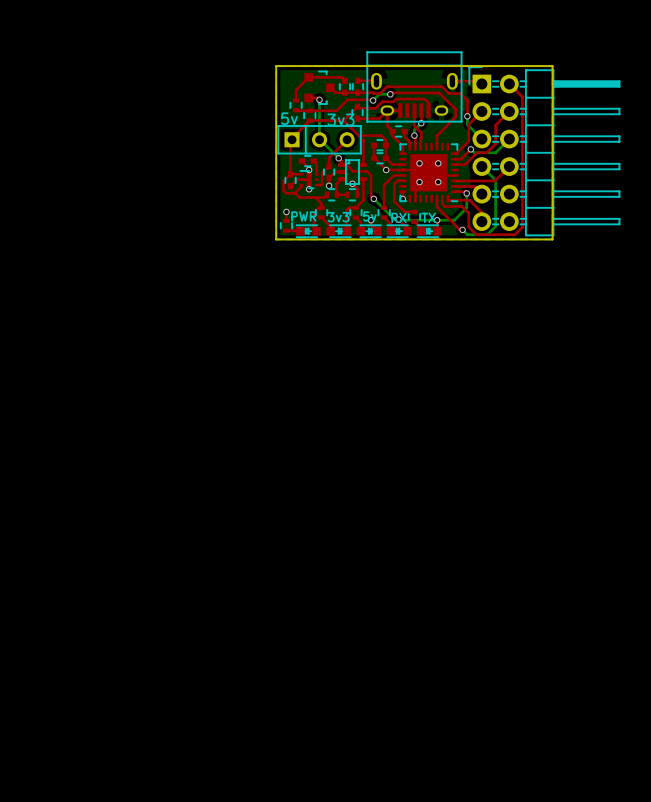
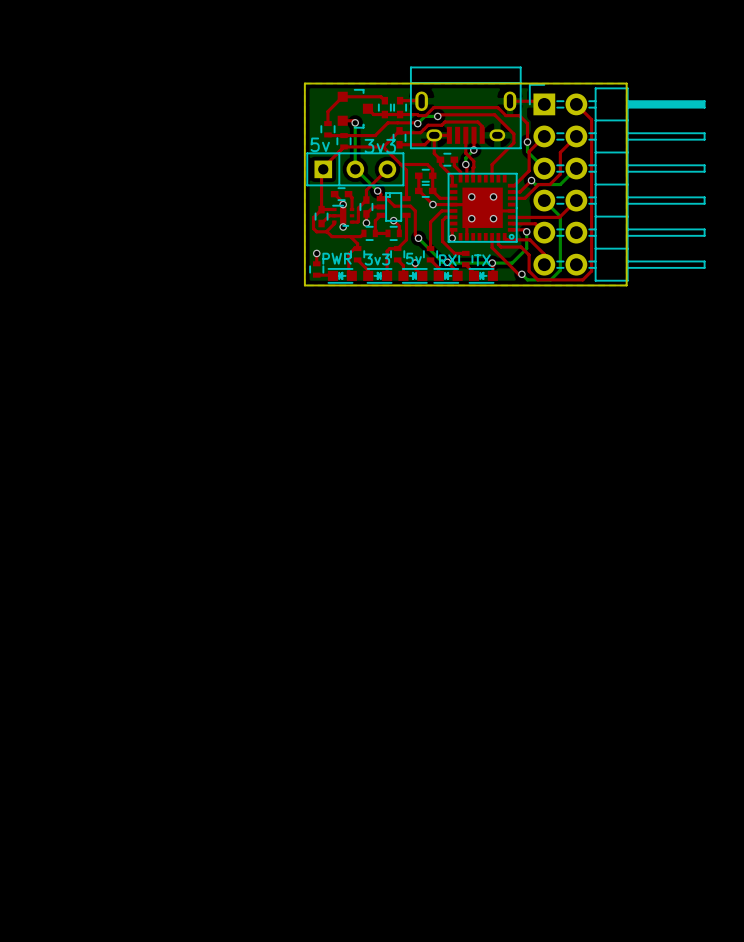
part footprint: [399, 142, 459, 203] -> [447, 172, 518, 243]

